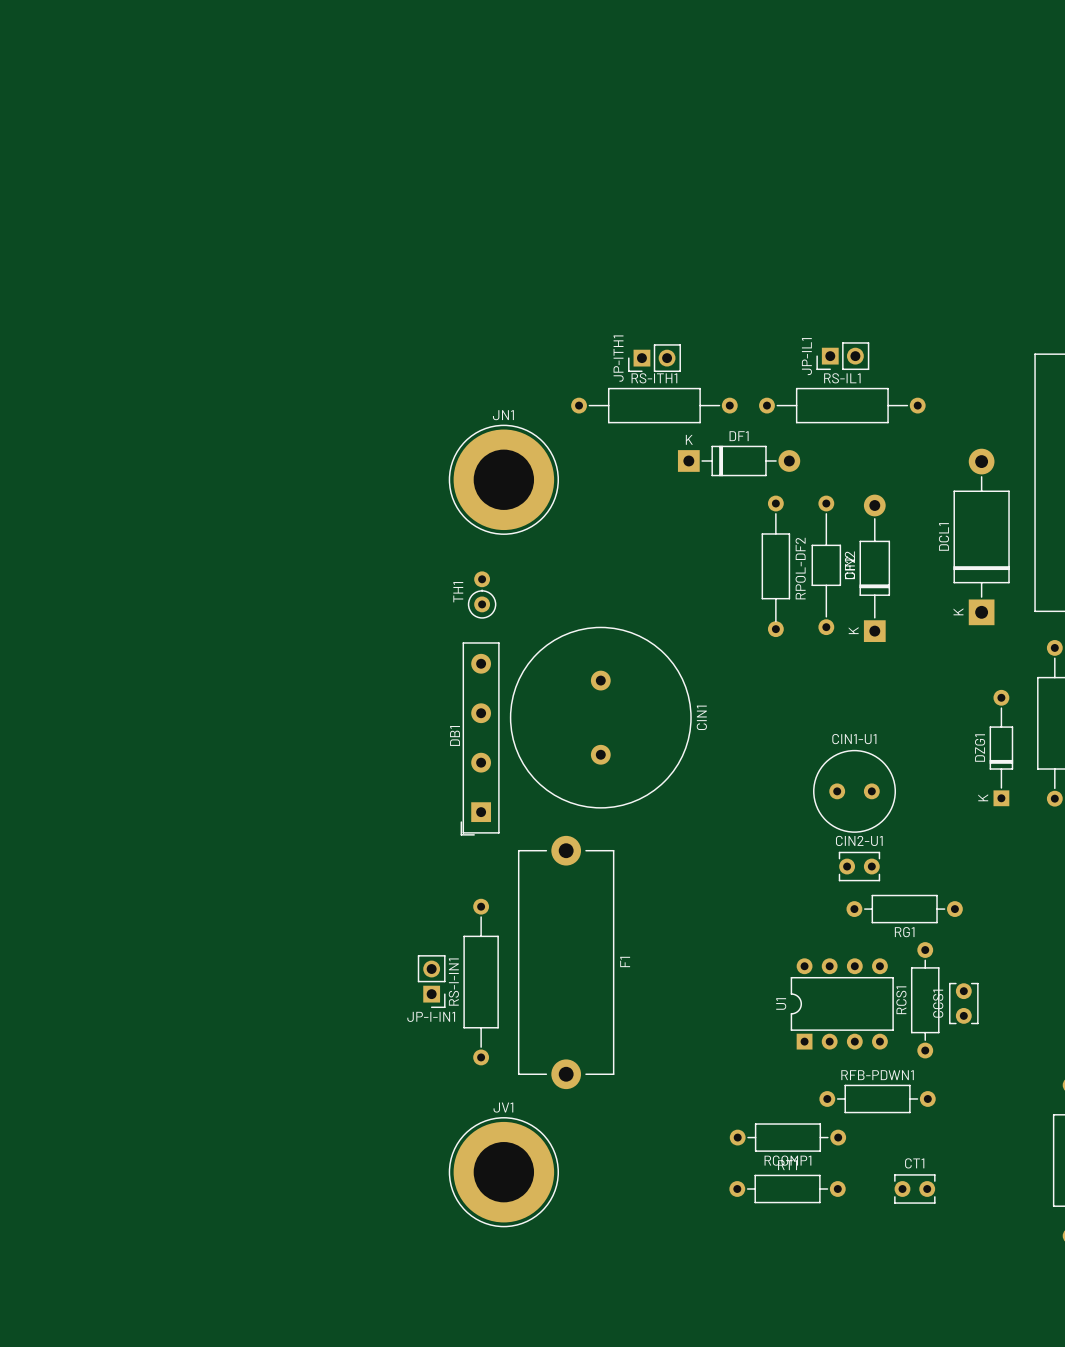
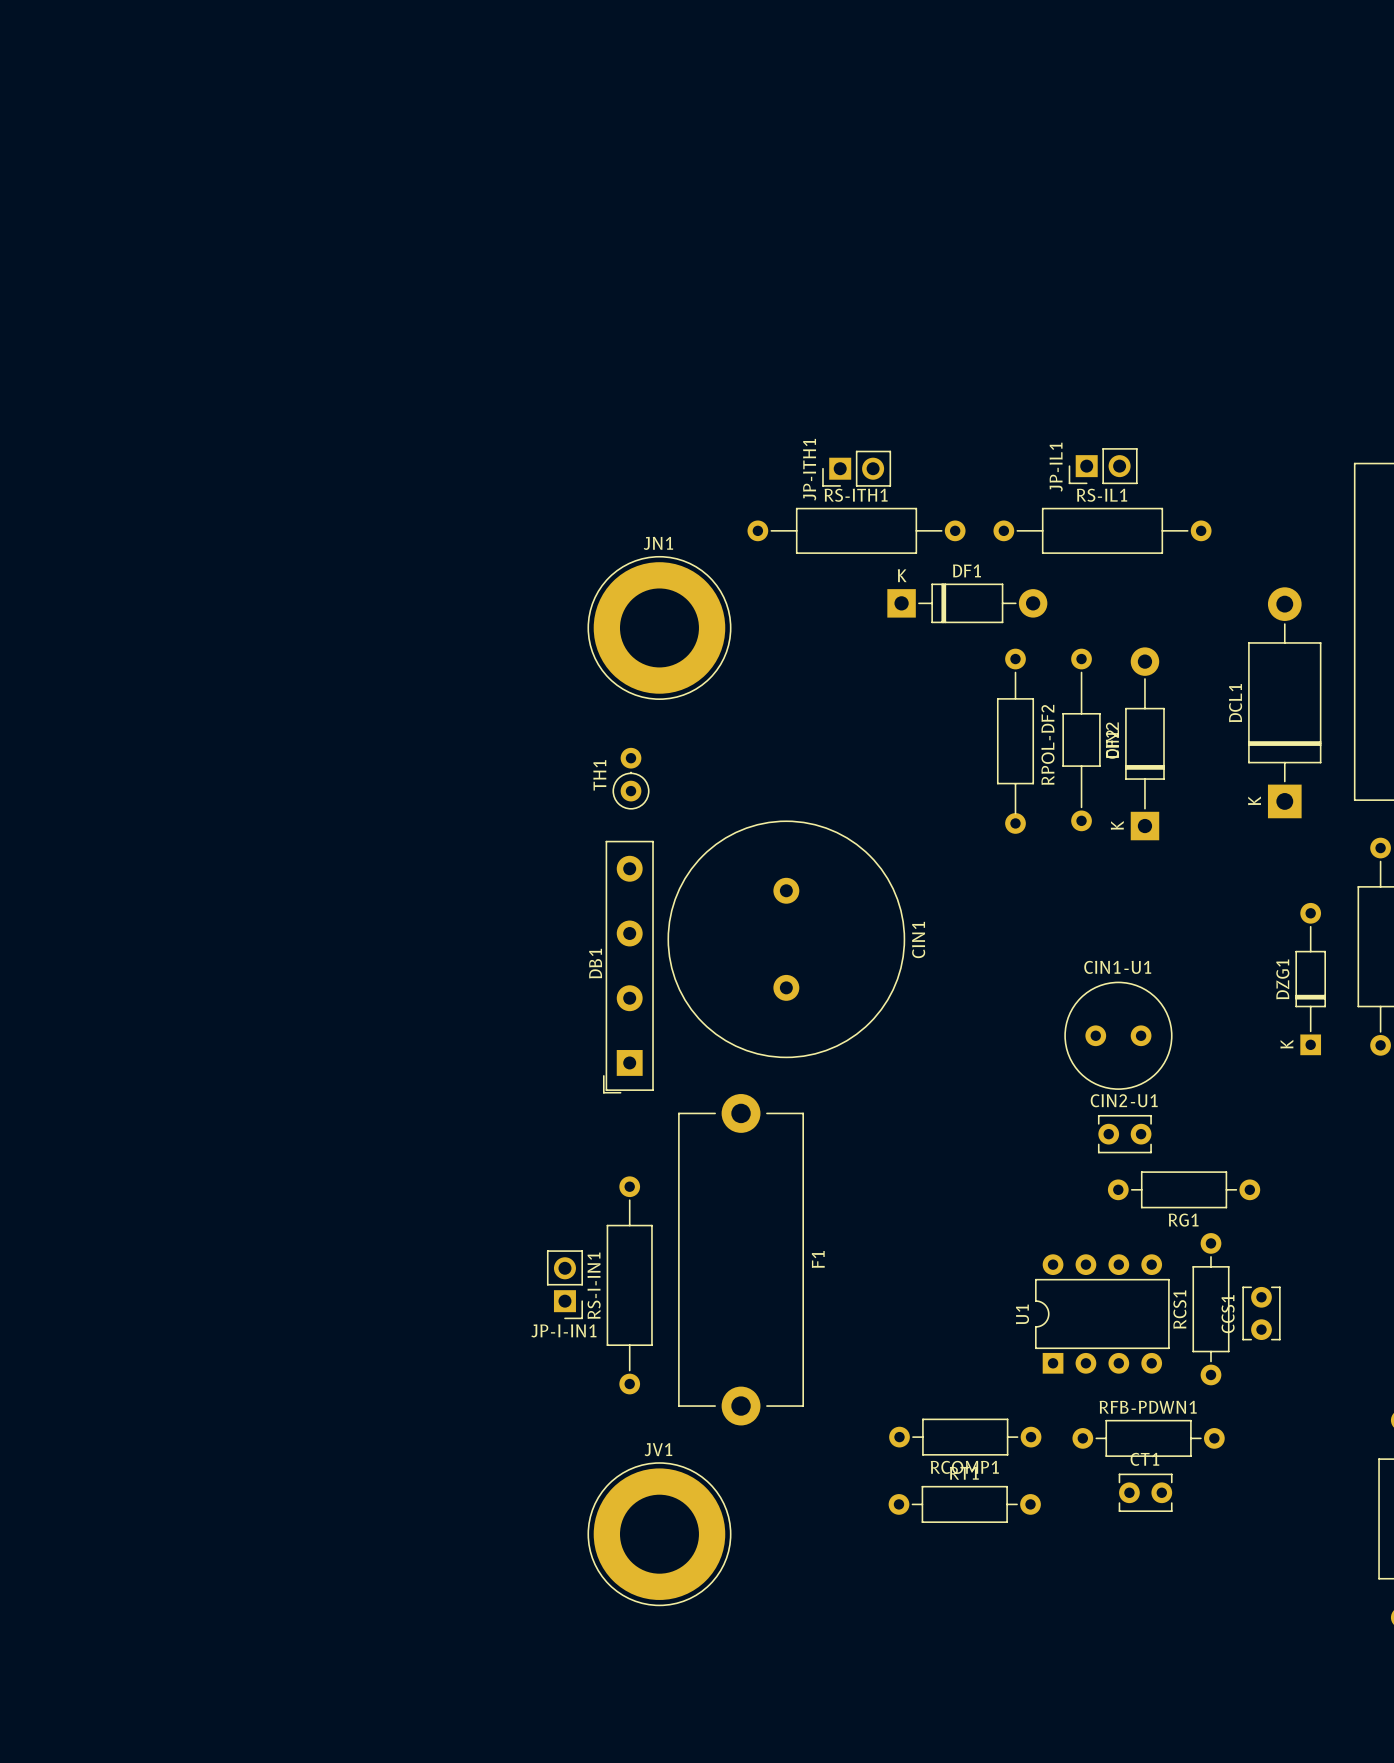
RCOMP1 position: (787, 1137) -> (965, 1437)
RT1 position: (787, 1188) -> (964, 1504)
CT1 position: (914, 1188) -> (1145, 1492)

